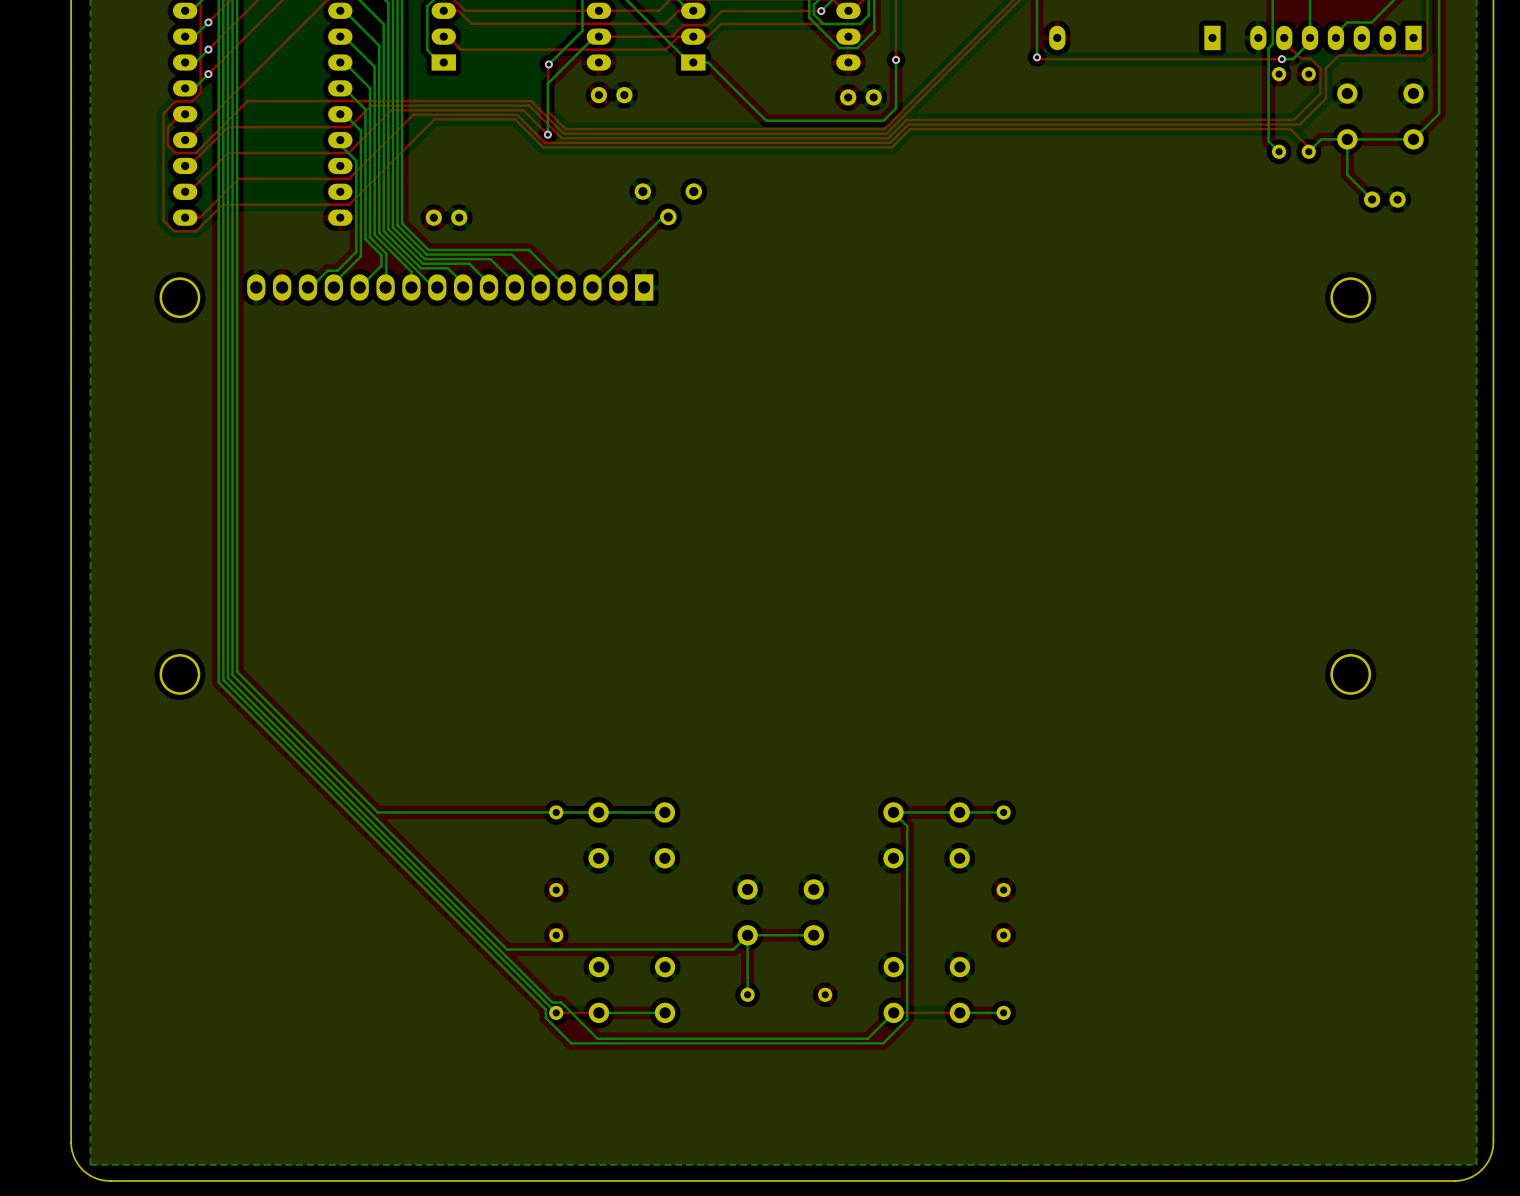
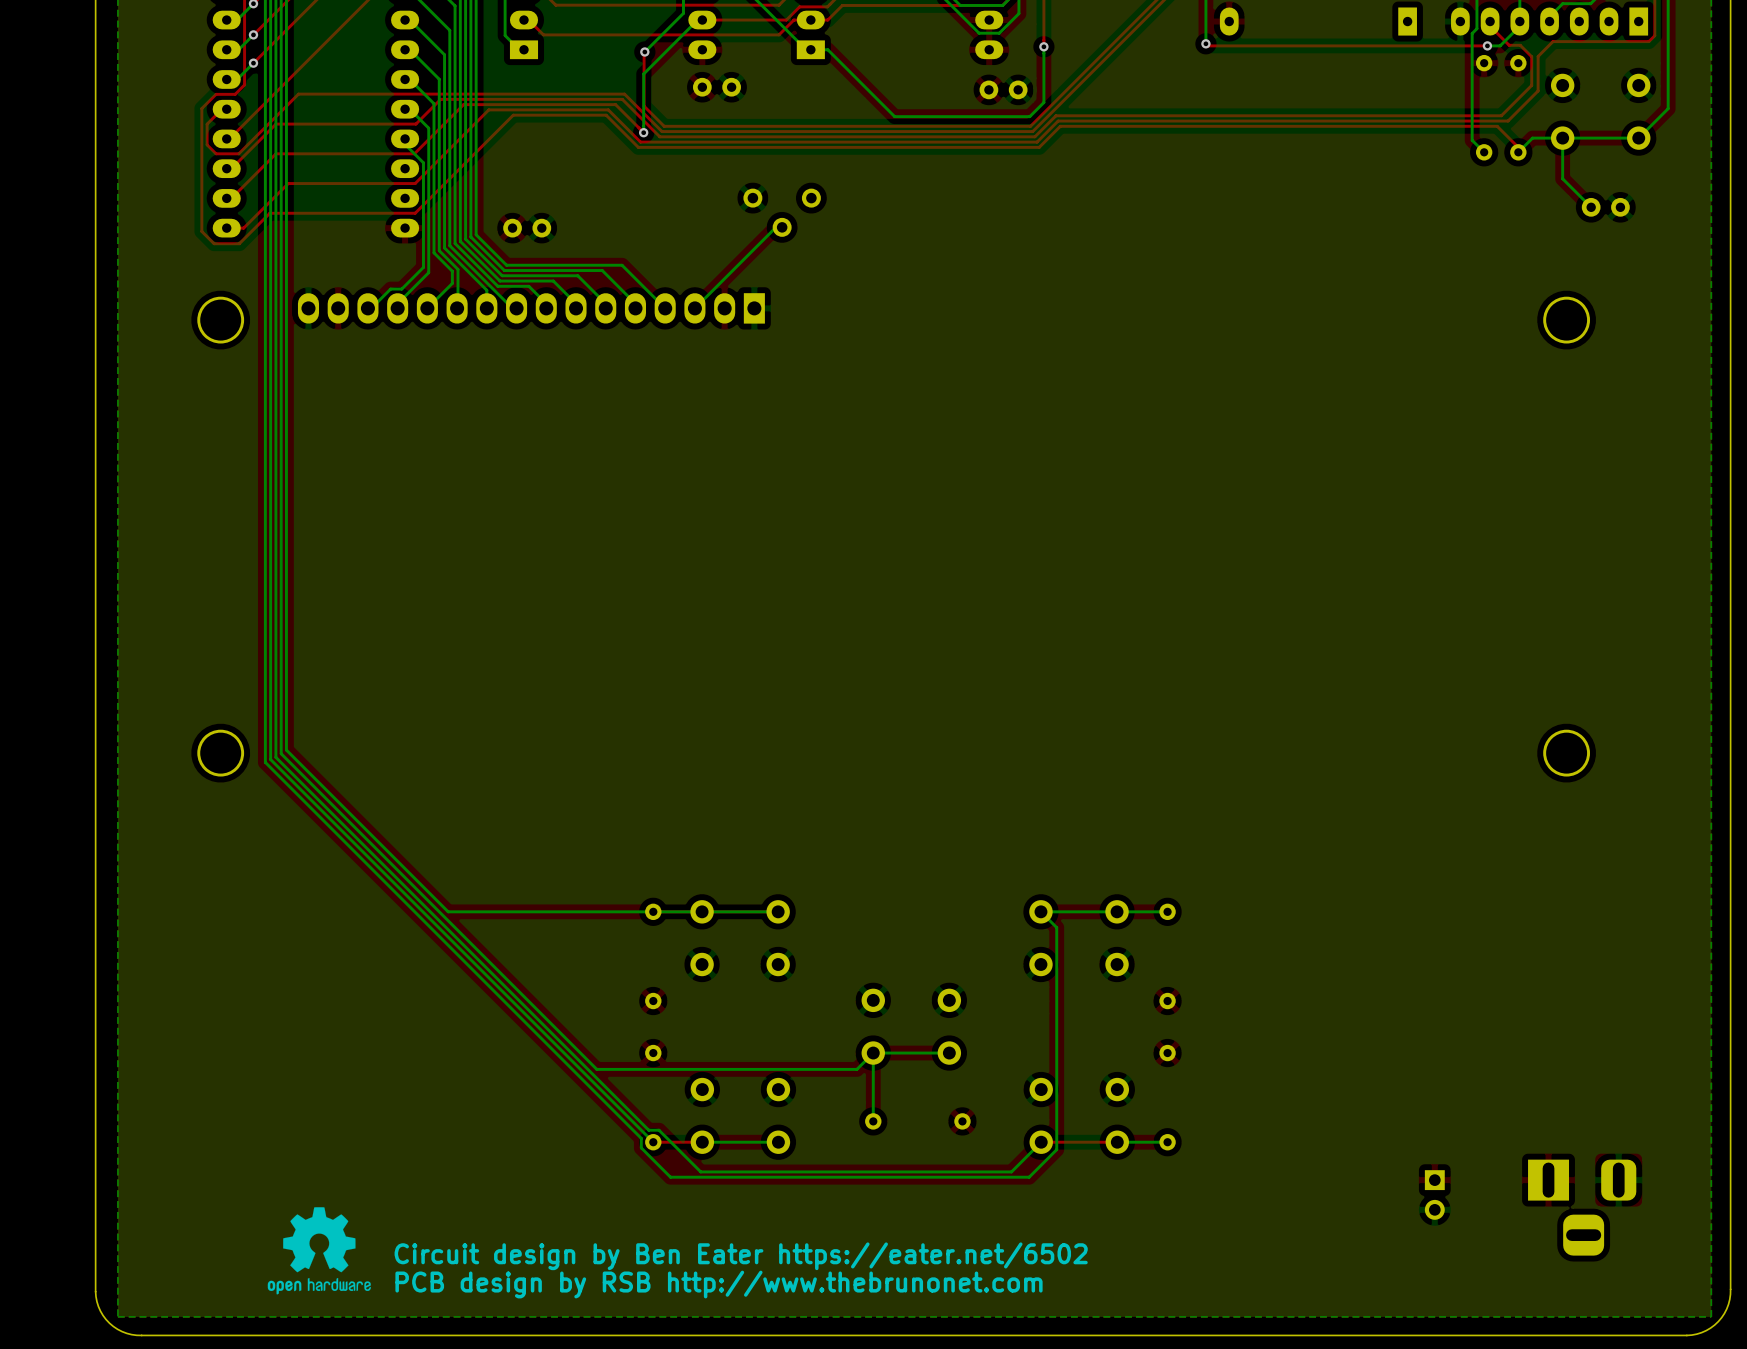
part: none -> (1434, 1194)
drawing: none -> [267, 1207, 371, 1295]
part: none -> (1582, 1207)
text: none -> Circuit design by Ben Eater https://eater.net/6502 (741, 1256)
text: none -> PCB design by RSB http://www.thebrunonet.com (719, 1284)

